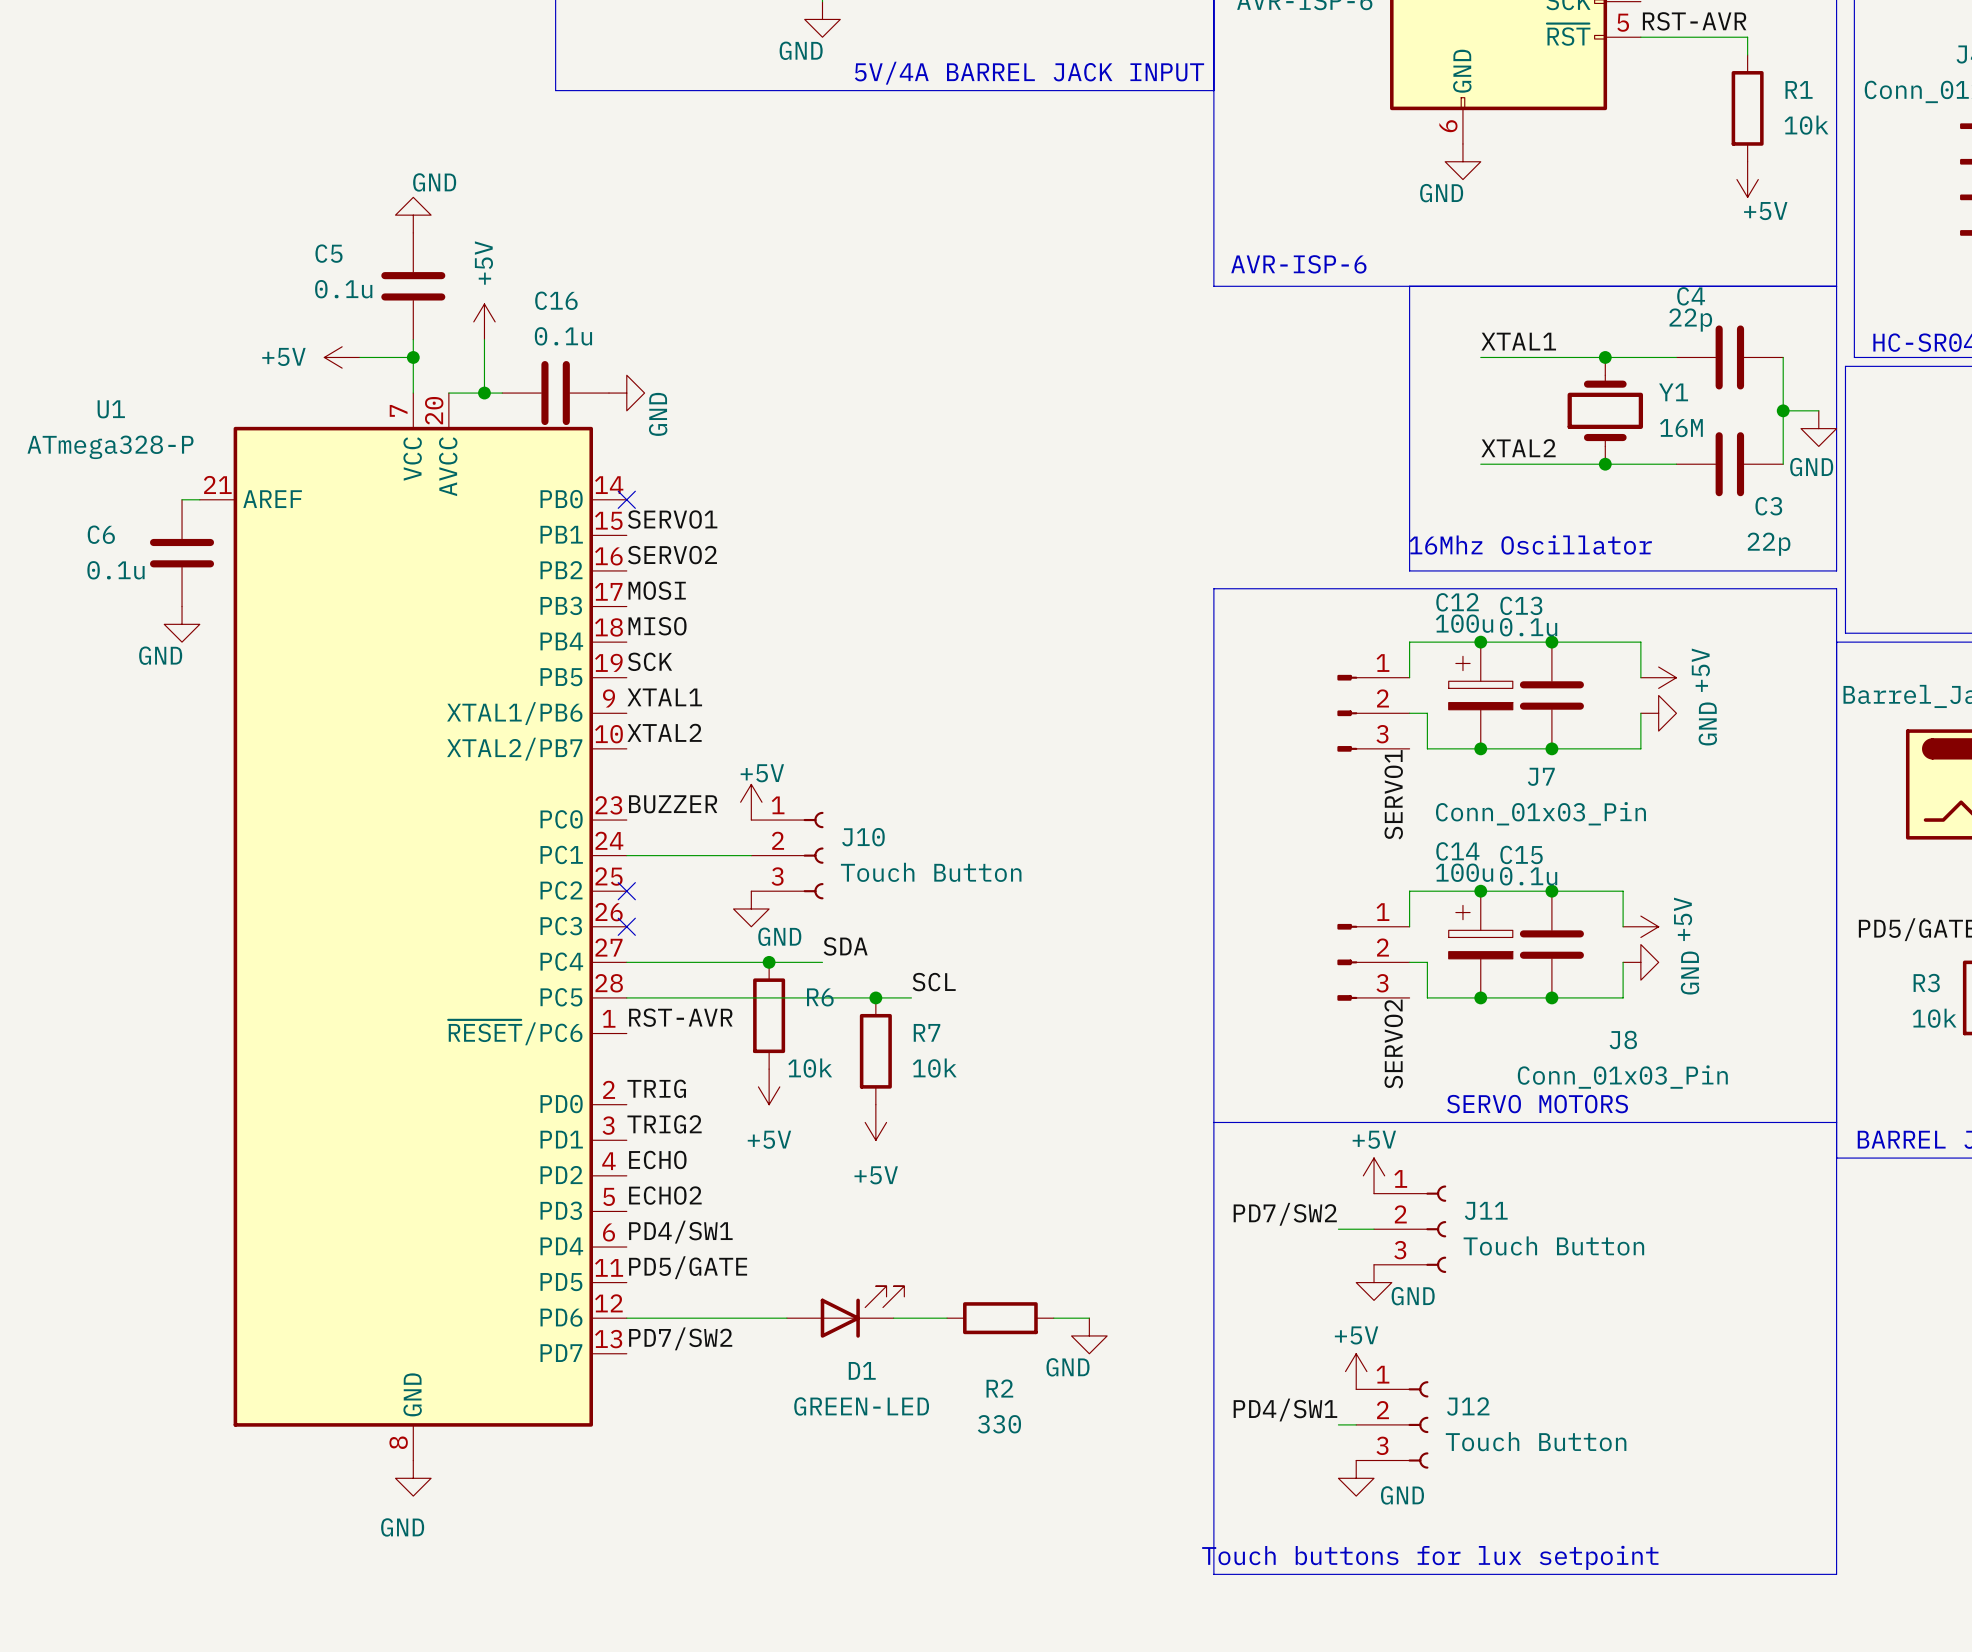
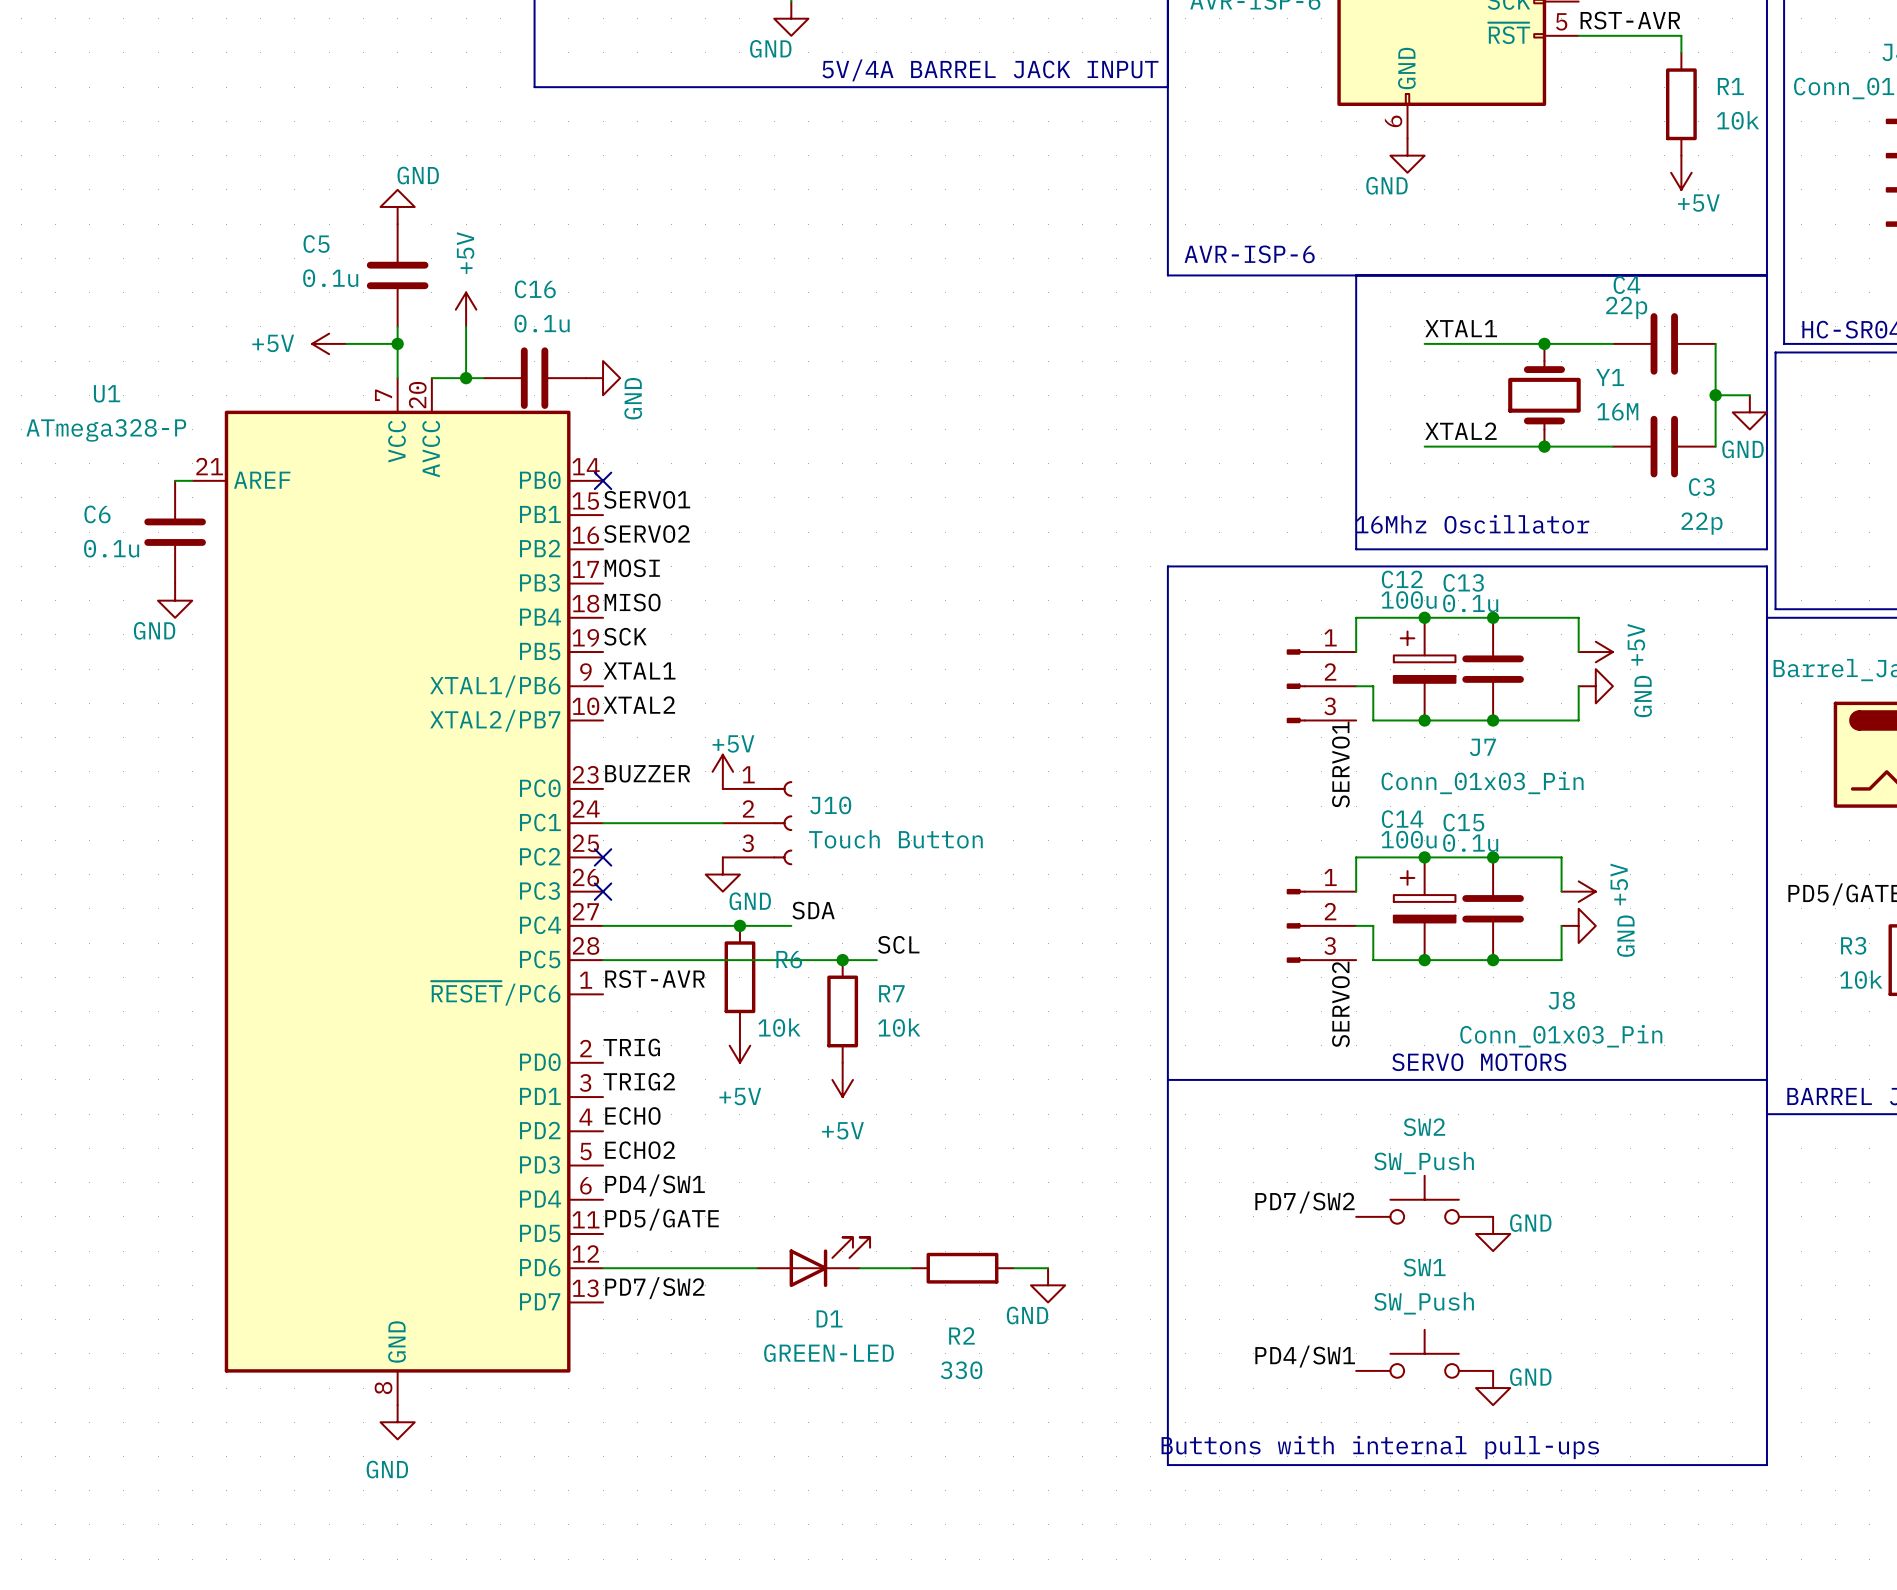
power symbol: +5V (1374, 1175) -> none
label position: PD7/SW2 (1285, 1214) -> PD7/SW2 (1305, 1202)
wire: (1338, 1229) (1374, 1229) -> none
J11: Touch Button (1410, 1229) -> none
SW2: none -> SW_Push (1424, 1199)
power symbol: GND (1374, 1282) -> none
power symbol: none -> GND (1493, 1233)
power symbol: +5V (1356, 1371) -> none
SW1: none -> SW_Push (1424, 1353)
label position: PD4/SW1 (1285, 1410) -> PD4/SW1 (1305, 1356)
wire: (1338, 1424) (1356, 1424) -> none
J12: Touch Button (1392, 1424) -> none
power symbol: none -> GND (1493, 1388)
power symbol: GND (1356, 1478) -> none
text: none -> Buttons with internal pull-ups (1380, 1447)
line: (1213, 1522) (1213, 1574) (1836, 1574) (1836, 1522) -> (1167, 1465) (1766, 1465)
text: Touch buttons for lux setpoint (1430, 1557) -> none

